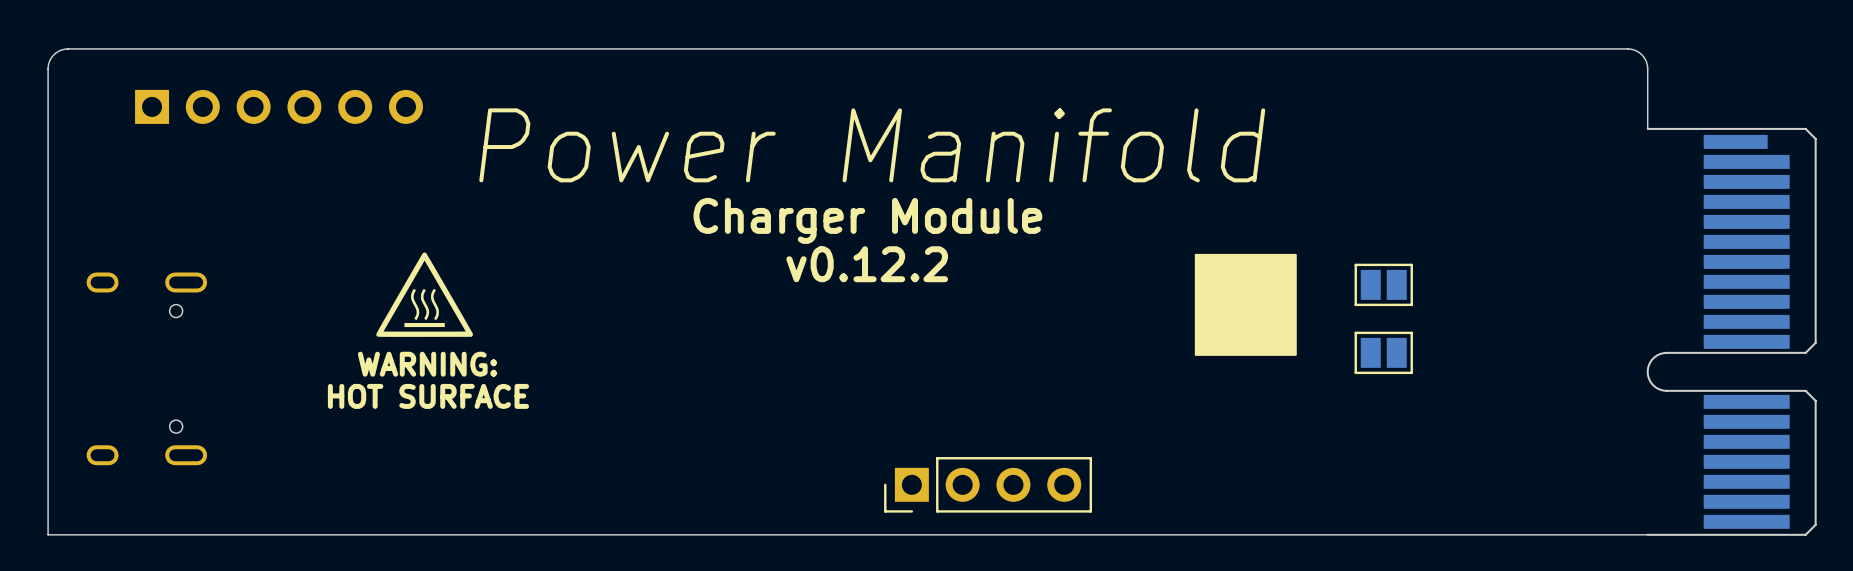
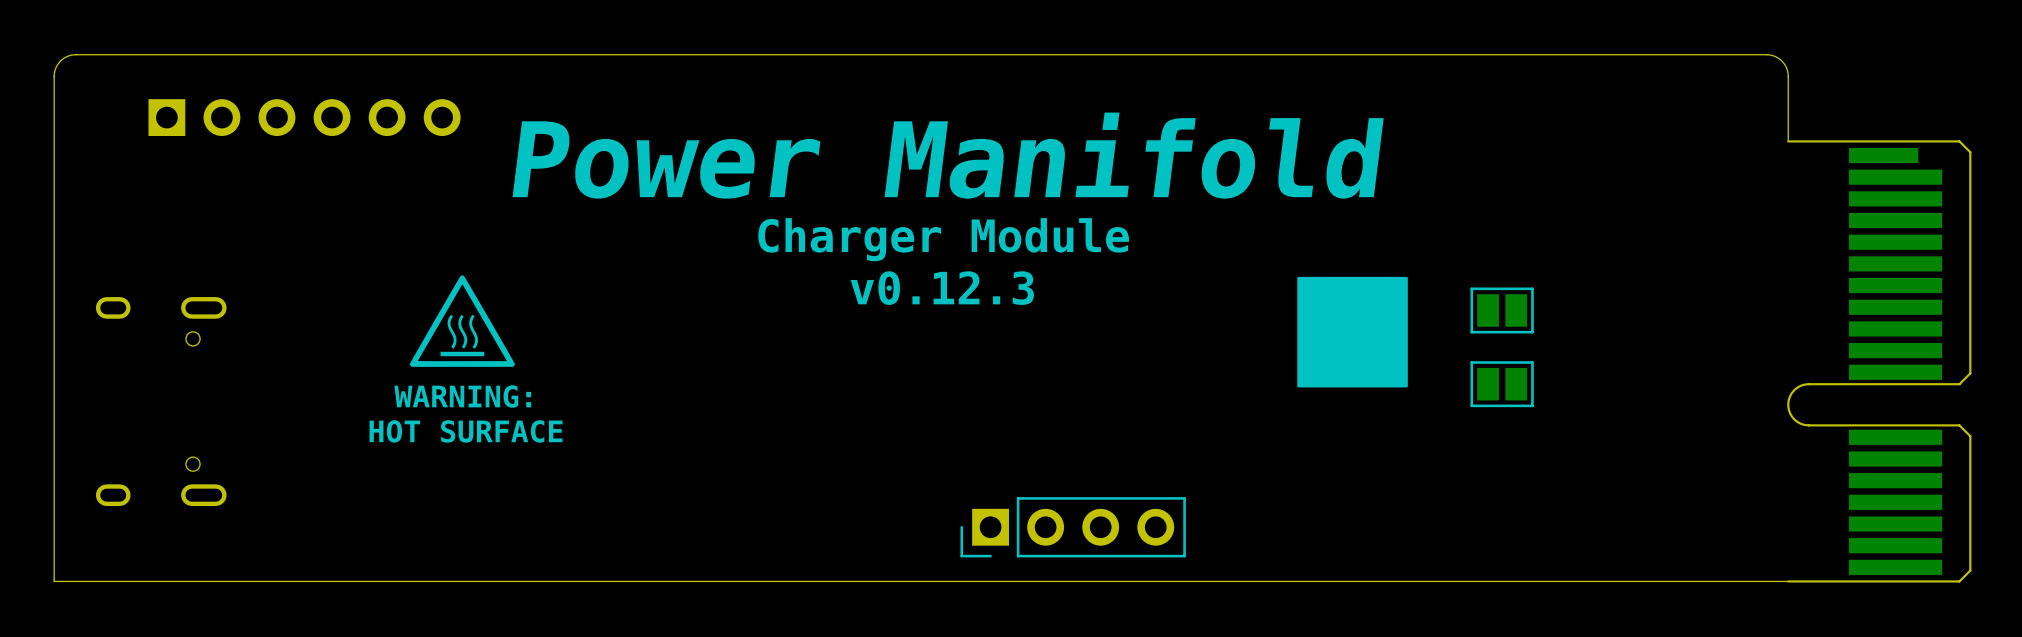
text: v0.12.2 (867, 264) -> v0.12.3 (942, 288)

